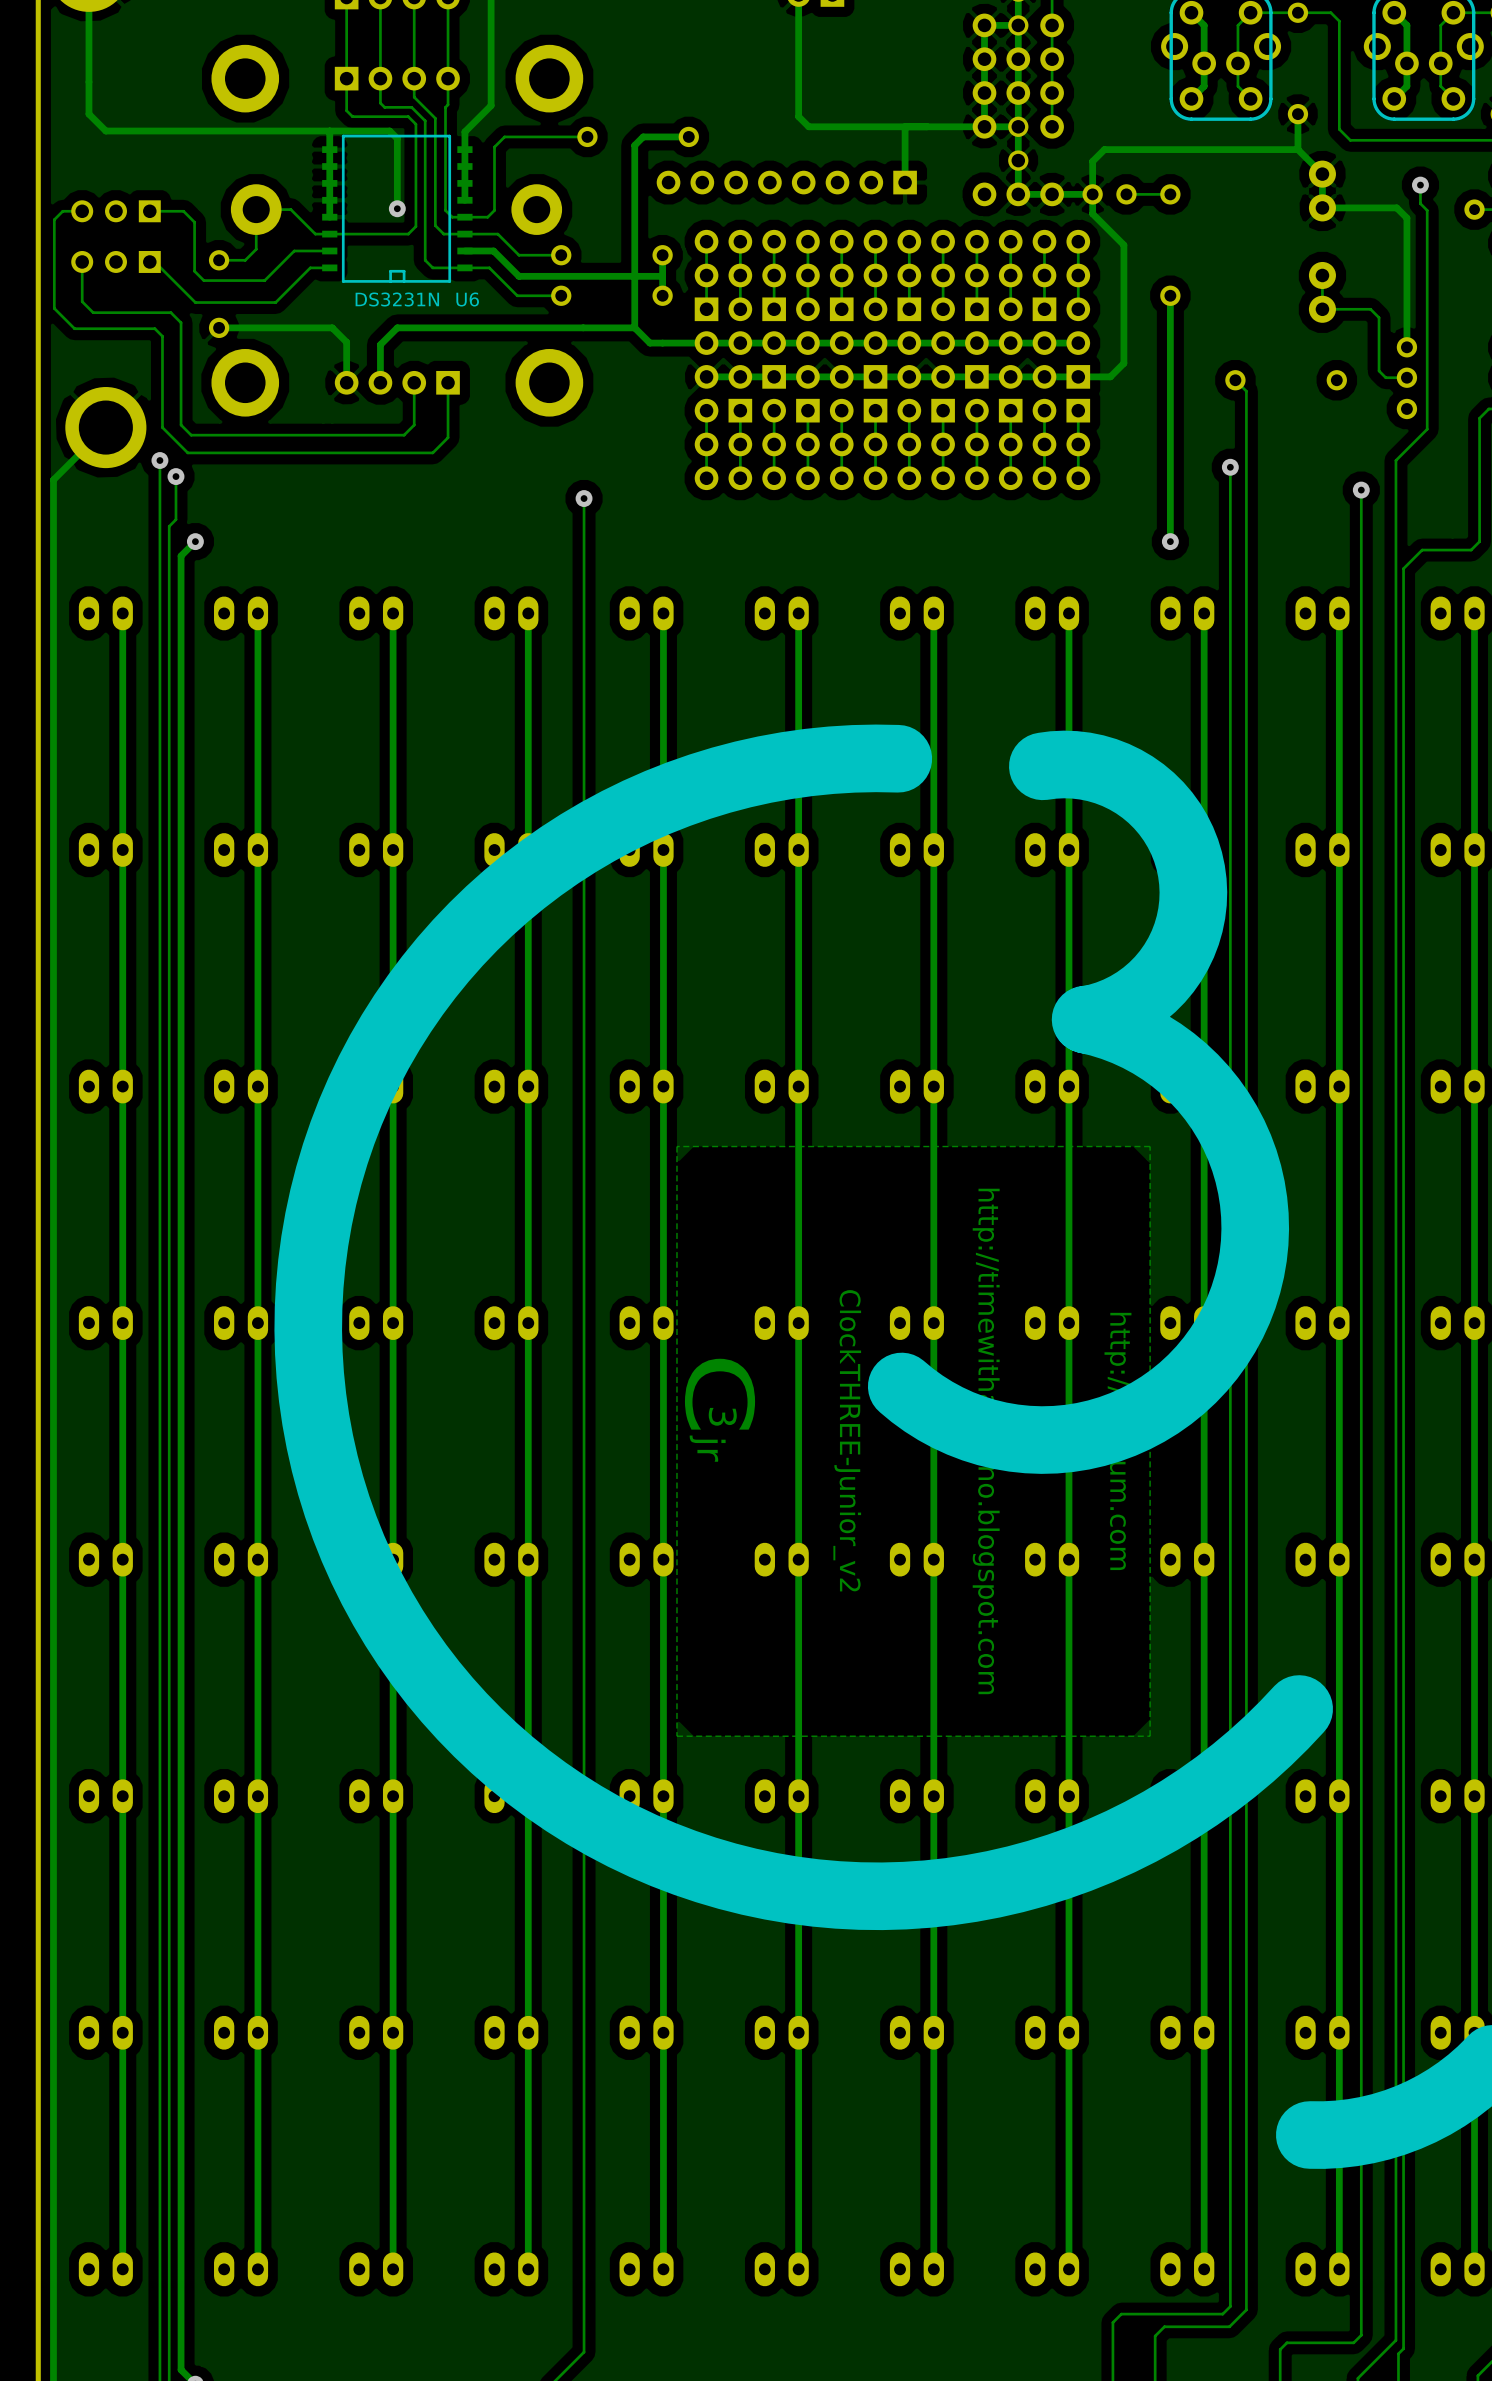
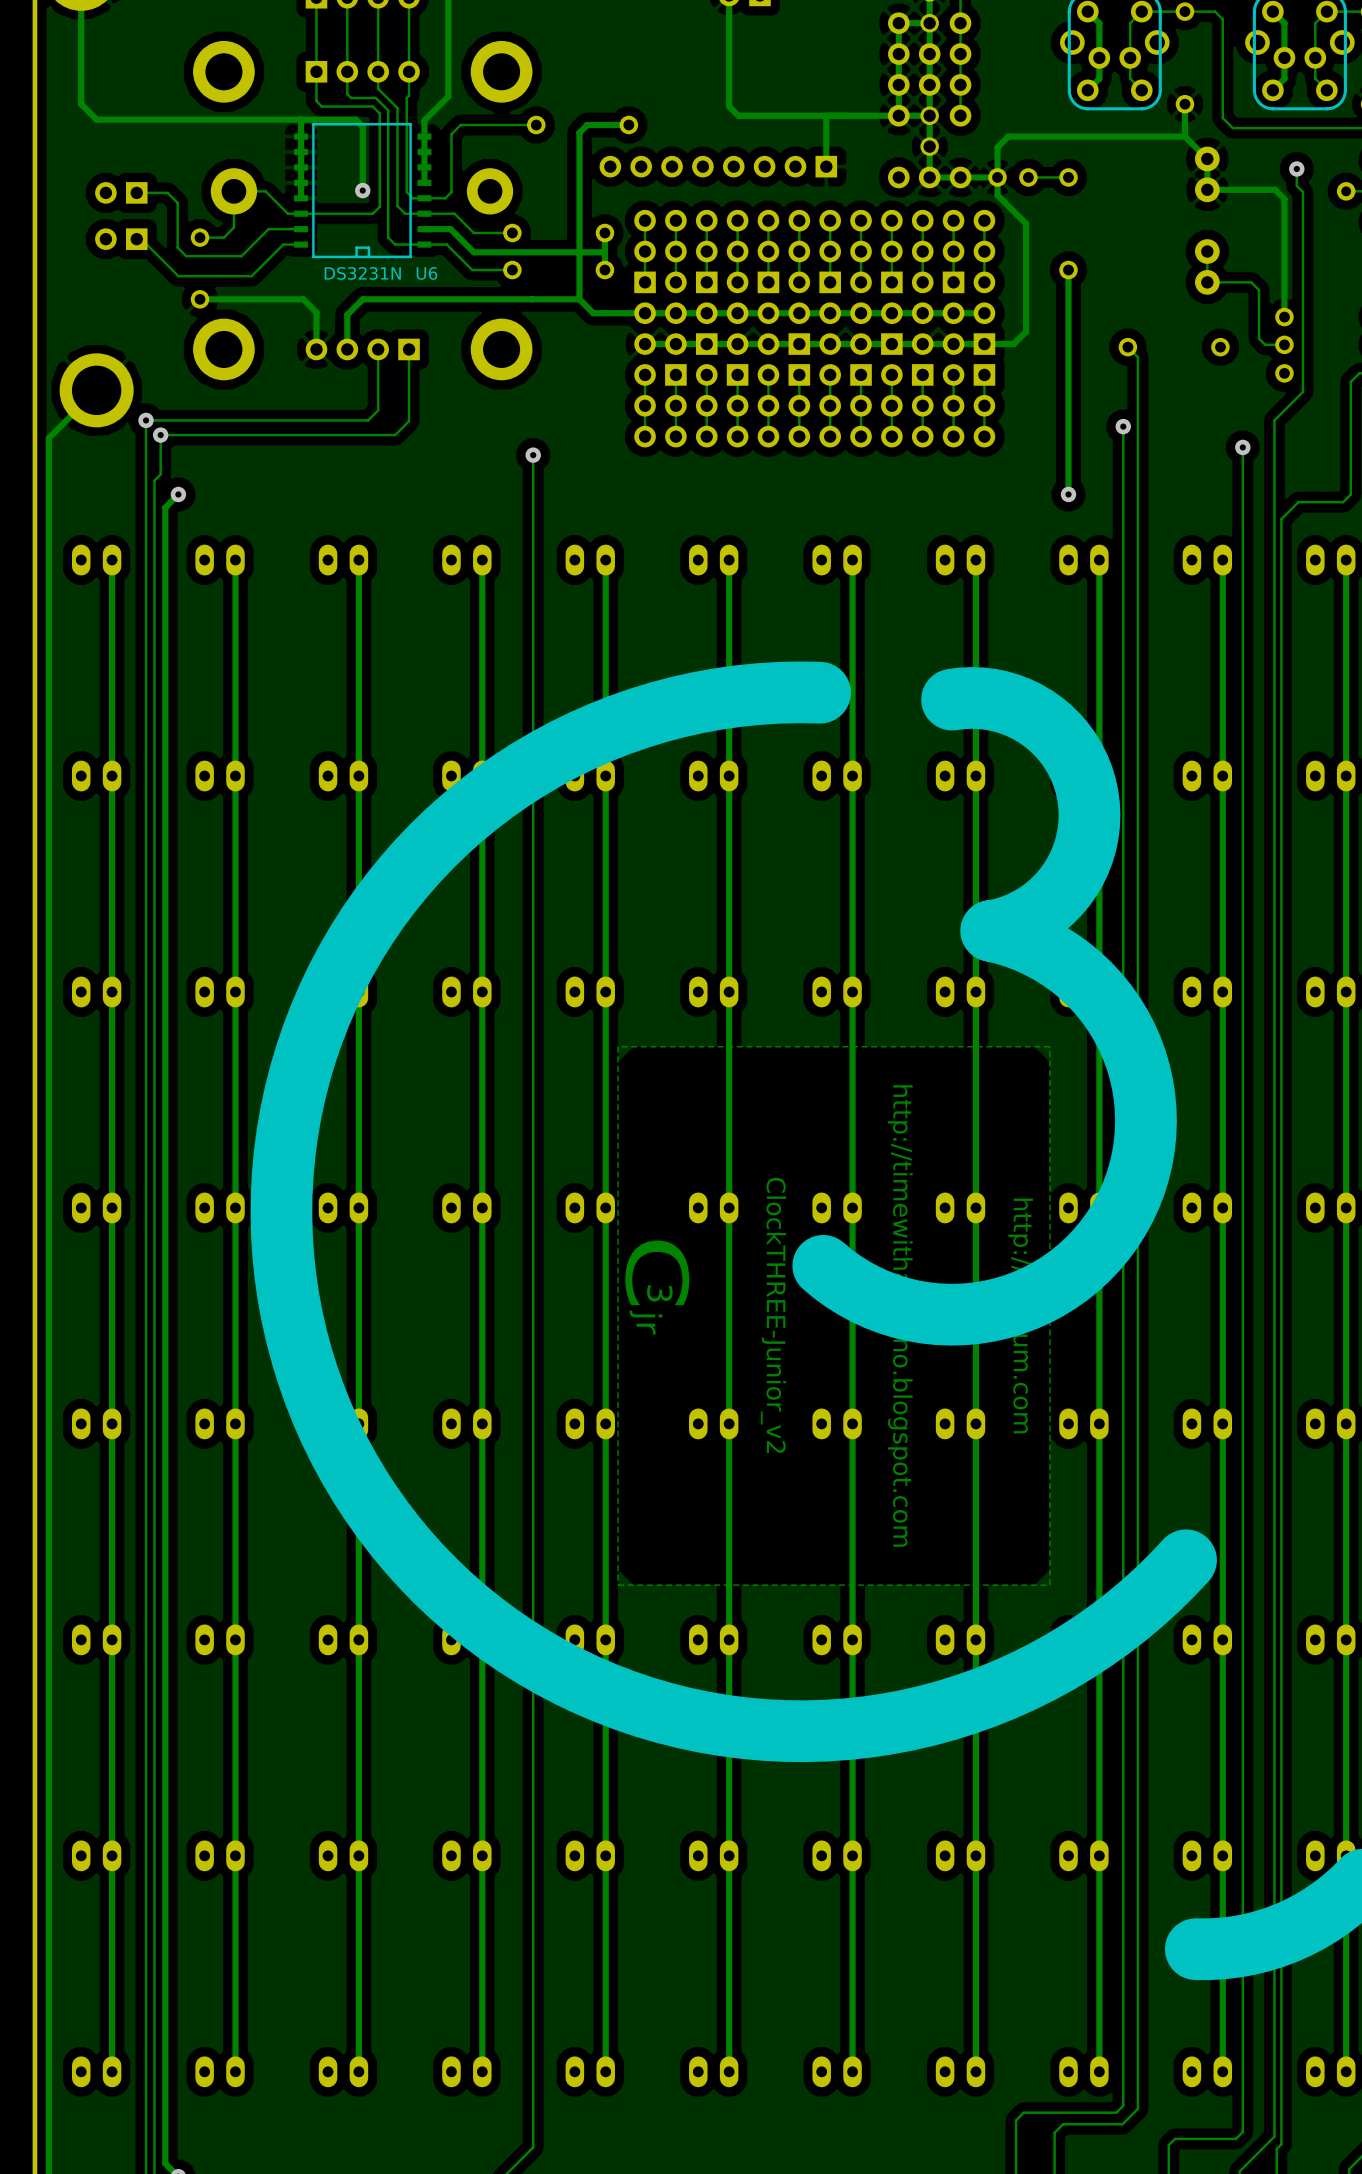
track: (82, 211) (62, 211) (54, 219) (54, 308) (74, 328) (154, 328) (162, 336) (162, 427) (187, 452) (432, 452) (448, 437) -> (160, 435) (395, 435) (409, 421) (409, 399)
part: (116, 211) -> none
part: none -> (121, 192)
track: (82, 261) (82, 301) (93, 312) (170, 312) (181, 322) (181, 425) (191, 435) (404, 435) (414, 425) -> (146, 420) (368, 420) (378, 410) (378, 388)
part: (116, 261) -> none
part: none -> (121, 239)

